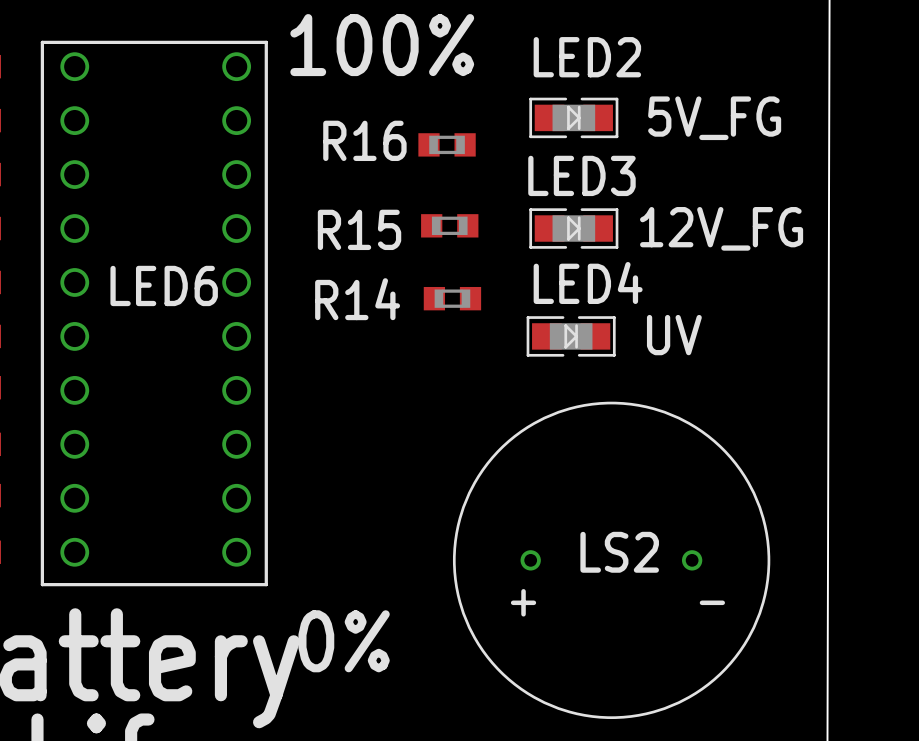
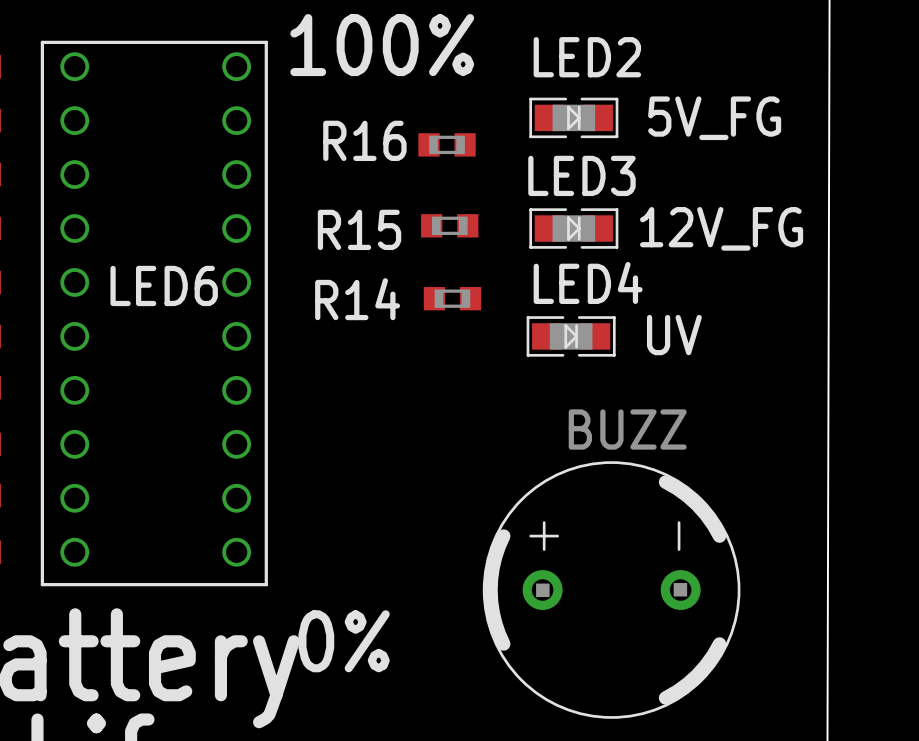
text: none -> BUZZ (627, 429)
LS2: (611, 560) -> none
part: none -> (611, 590)

